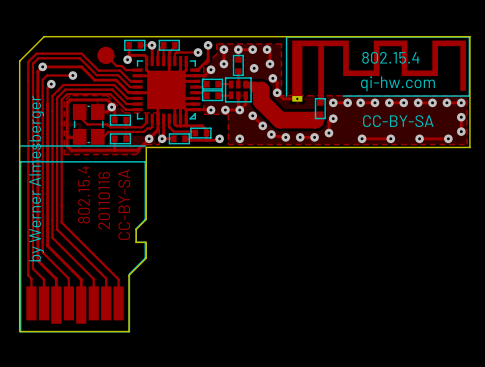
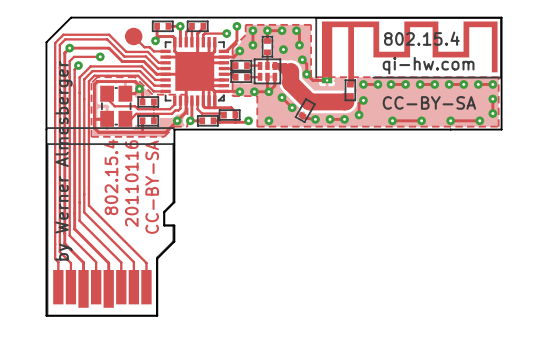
part: none -> (305, 110)
via: (271, 134) -> none

